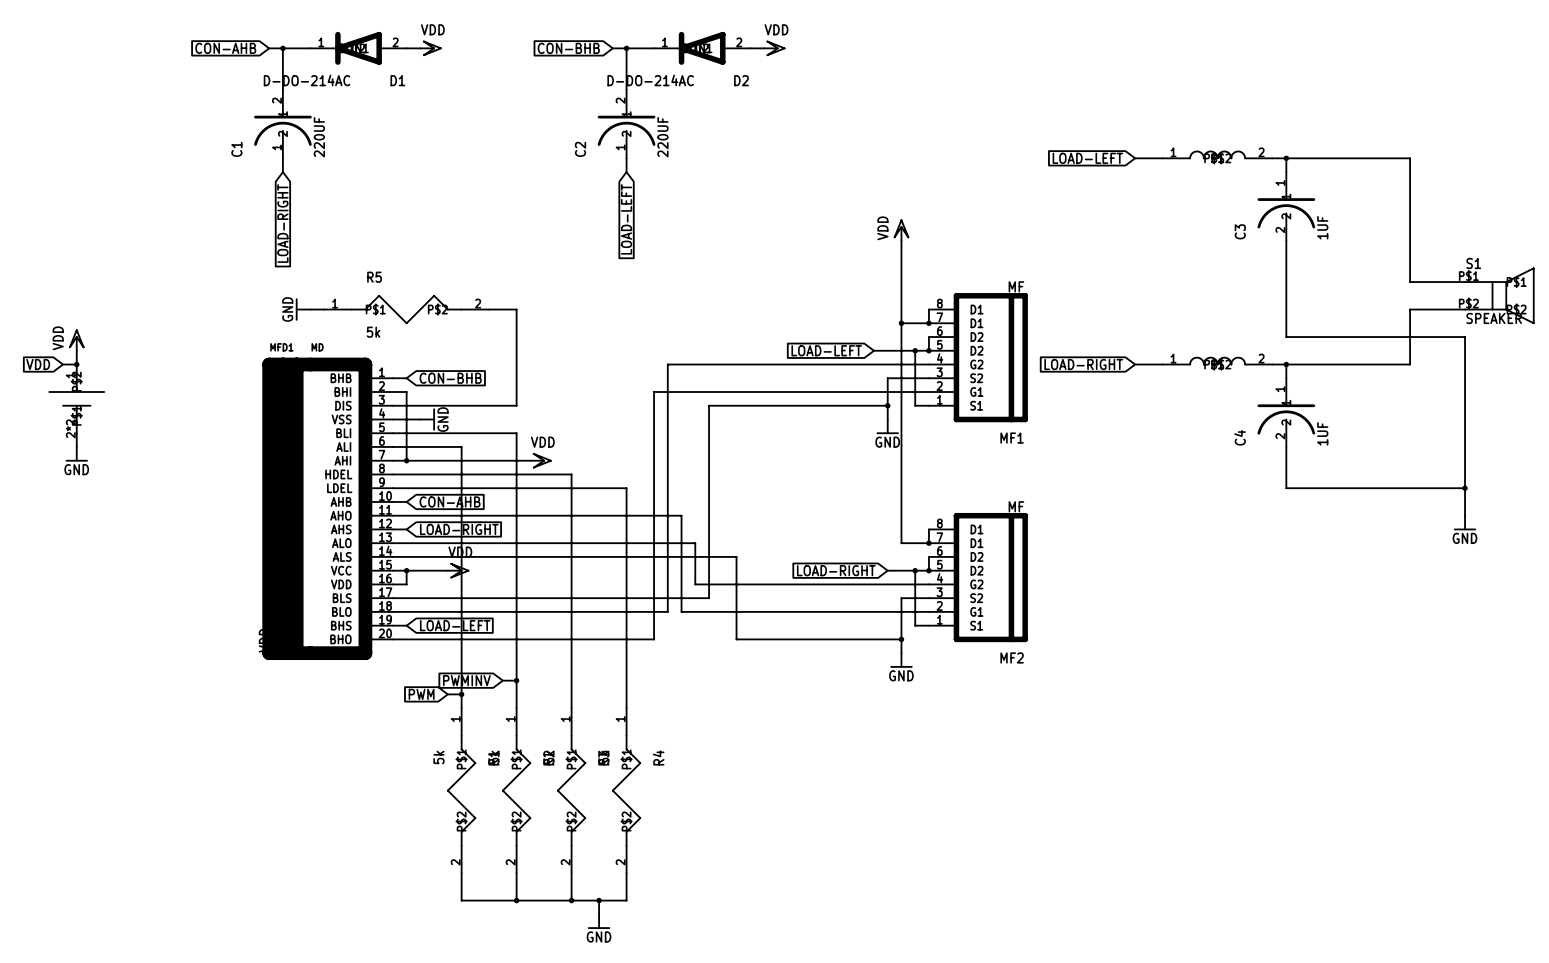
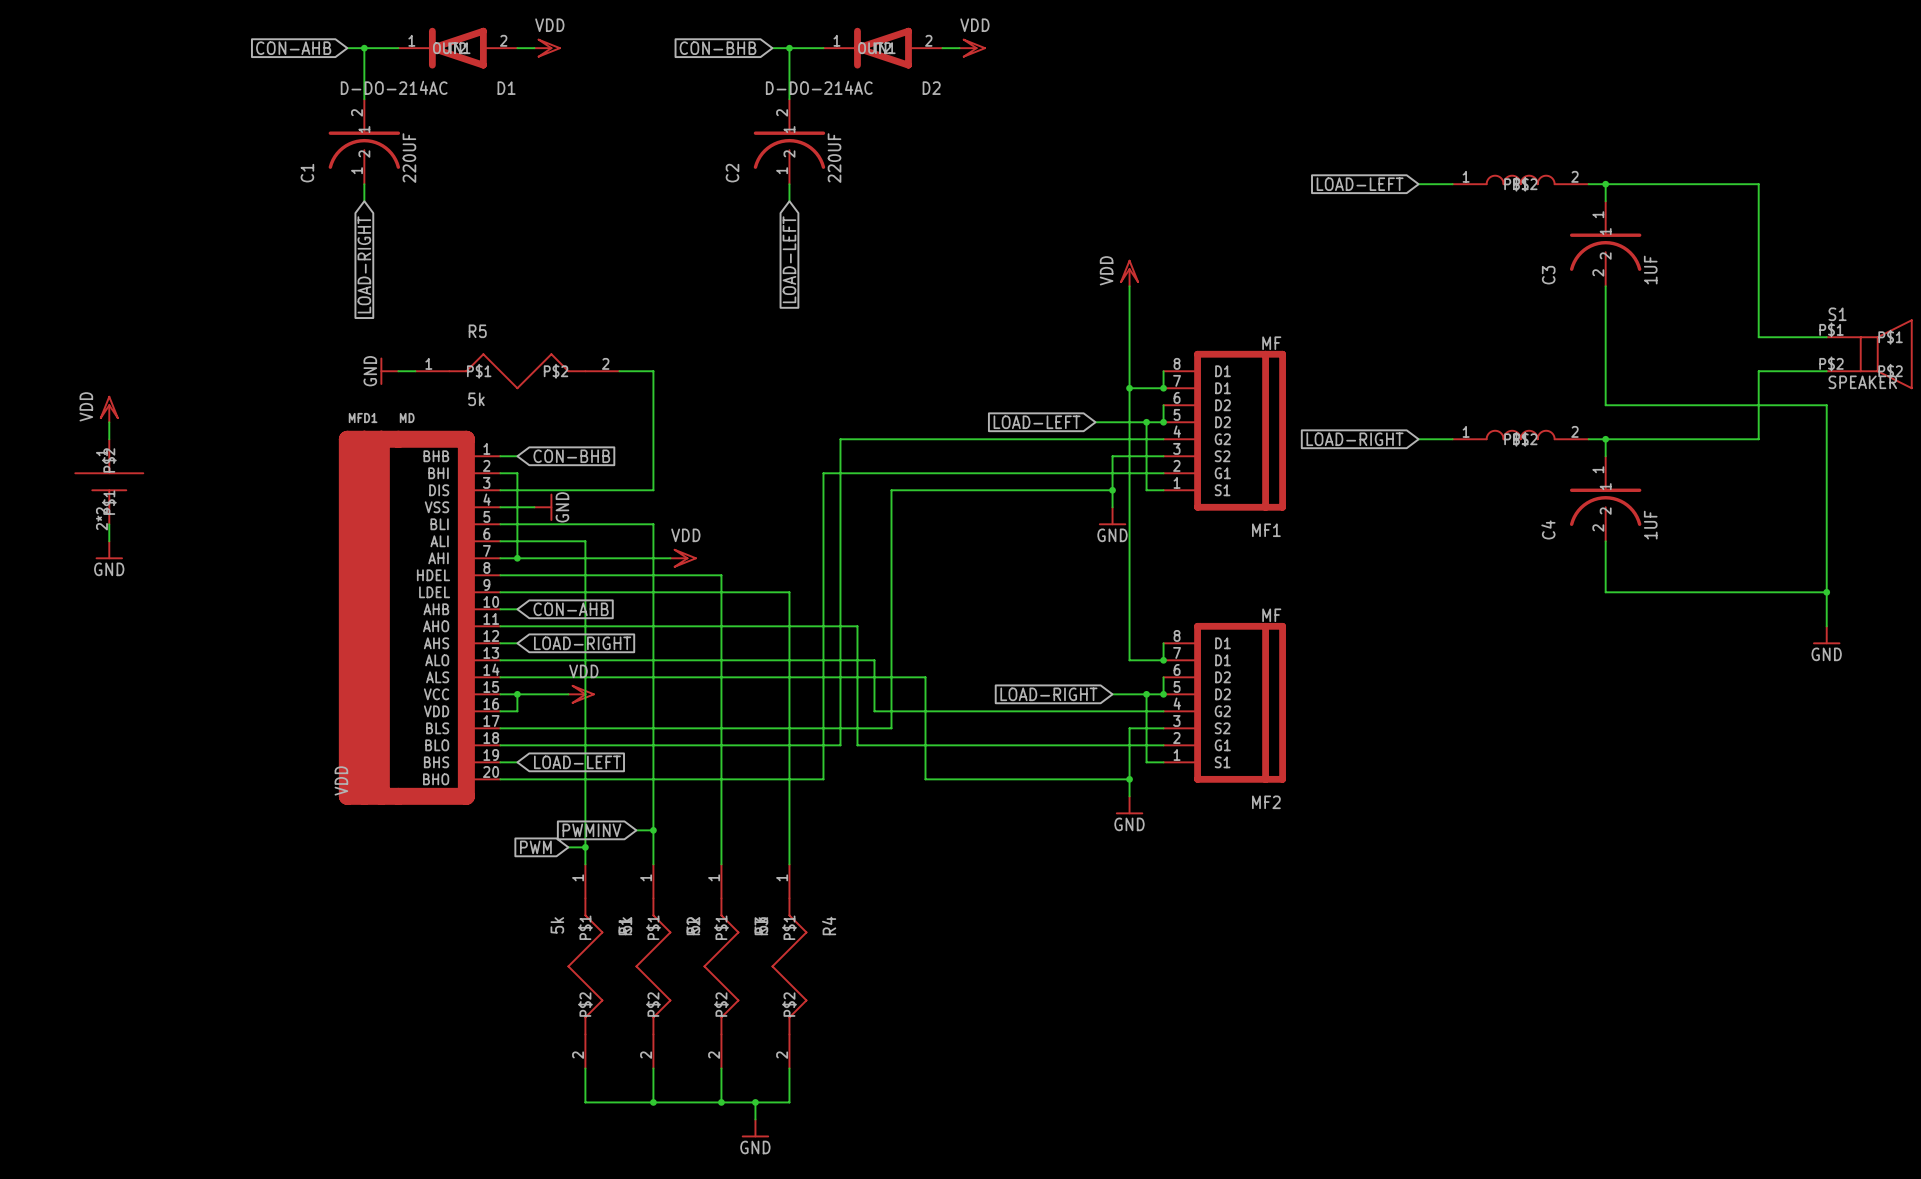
global label: VDD (38, 364) -> none
wire: (63, 364) (76, 364) -> none
junction: (76, 364) -> none

